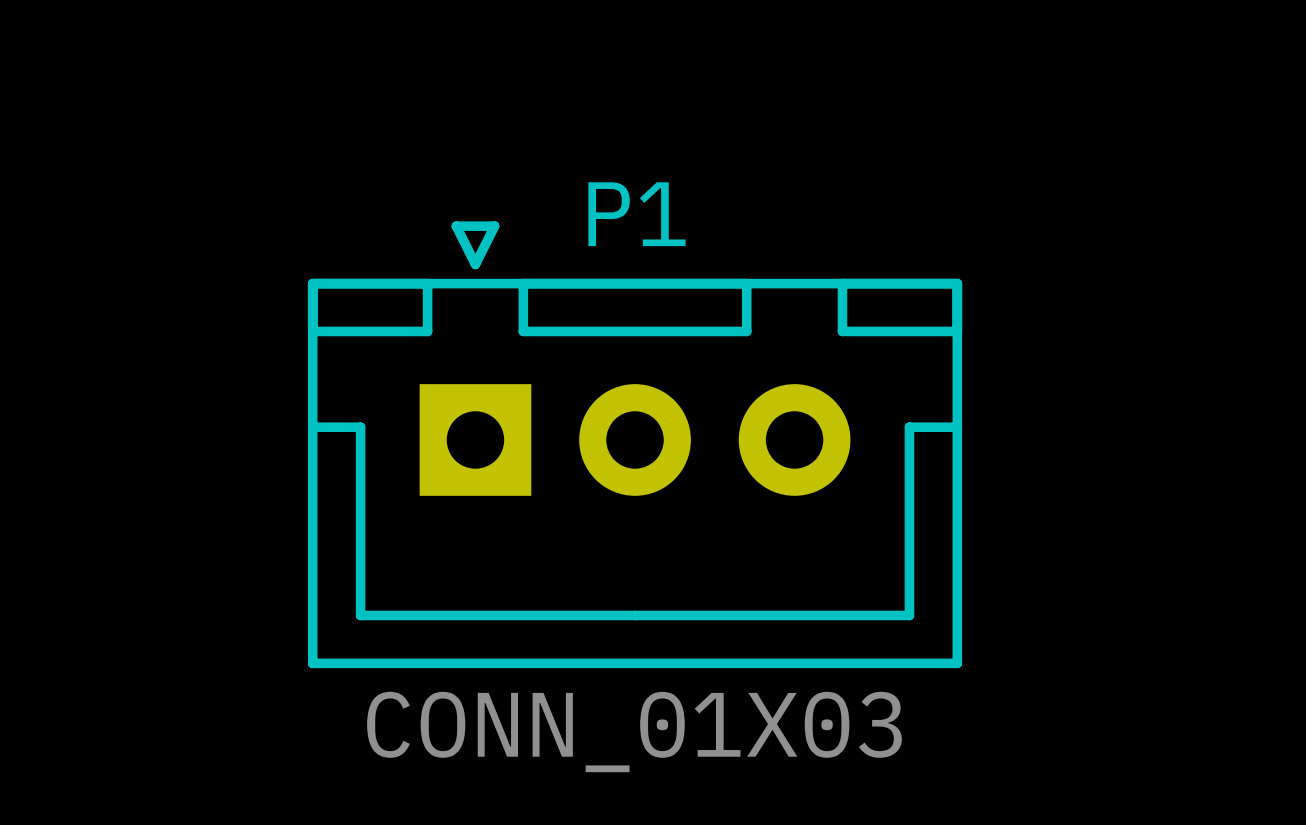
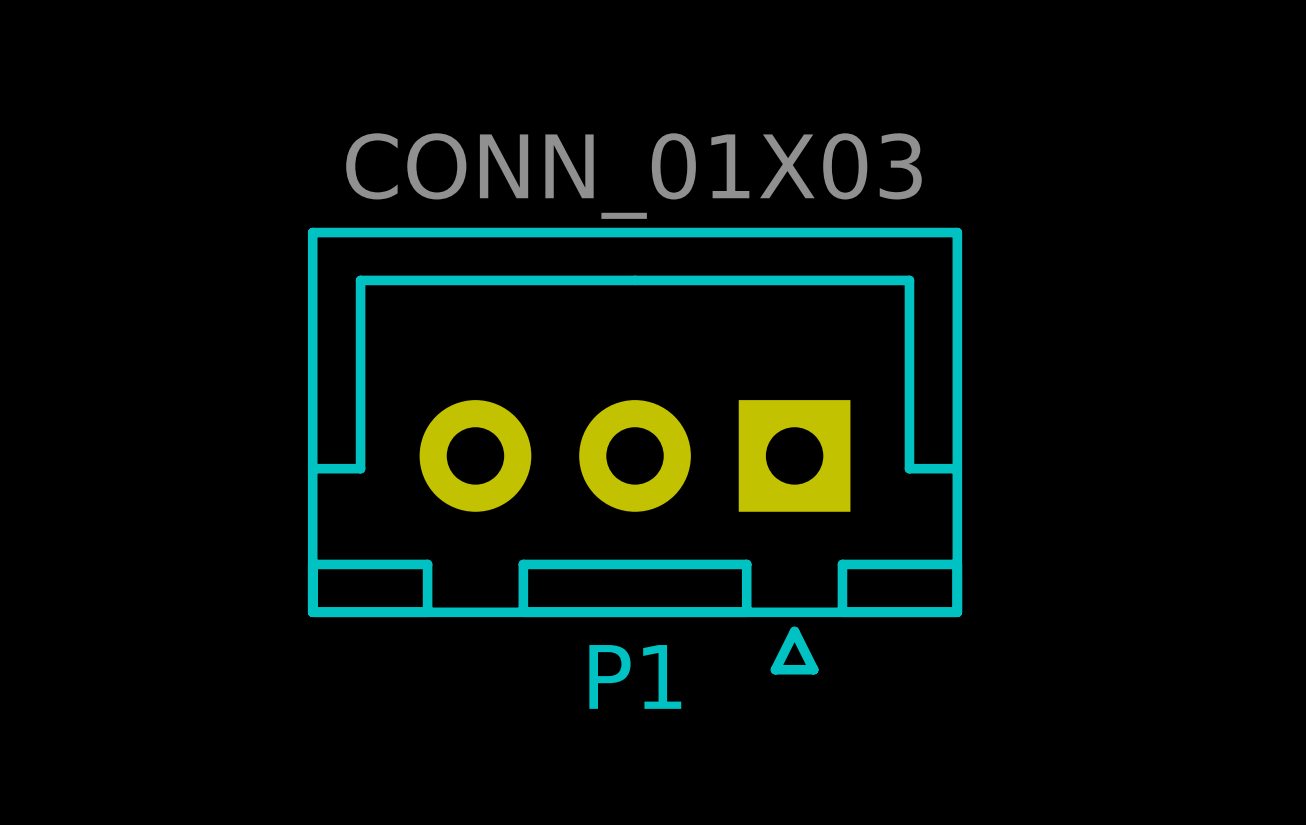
P1 rotation: 0° (635, 444) -> 180° (635, 451)

